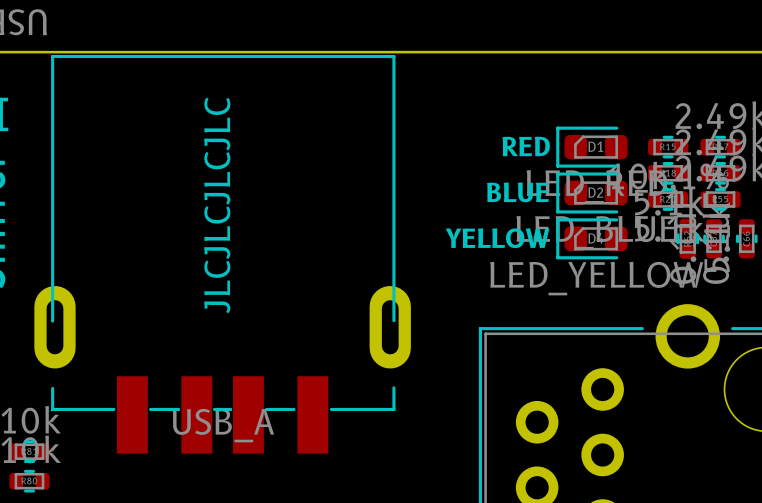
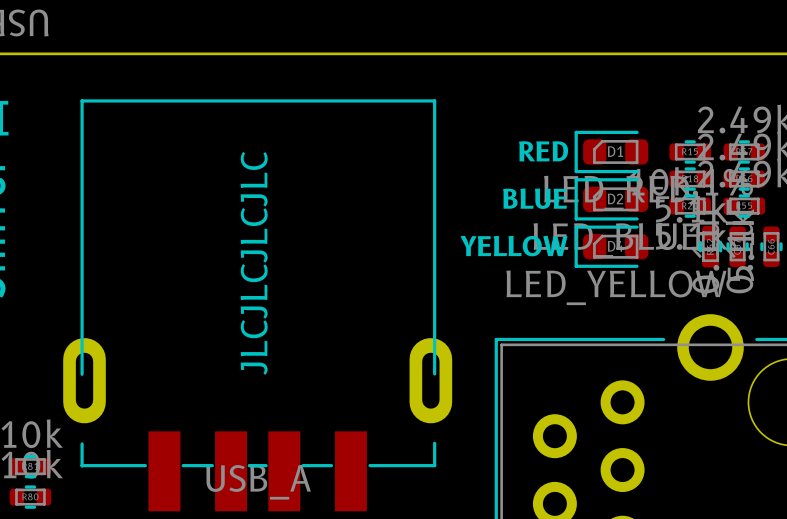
text position: JLCJLCJLCJLC (217, 205) -> JLCJLCJLCJLC (254, 263)
part position: (222, 254) -> (257, 305)

